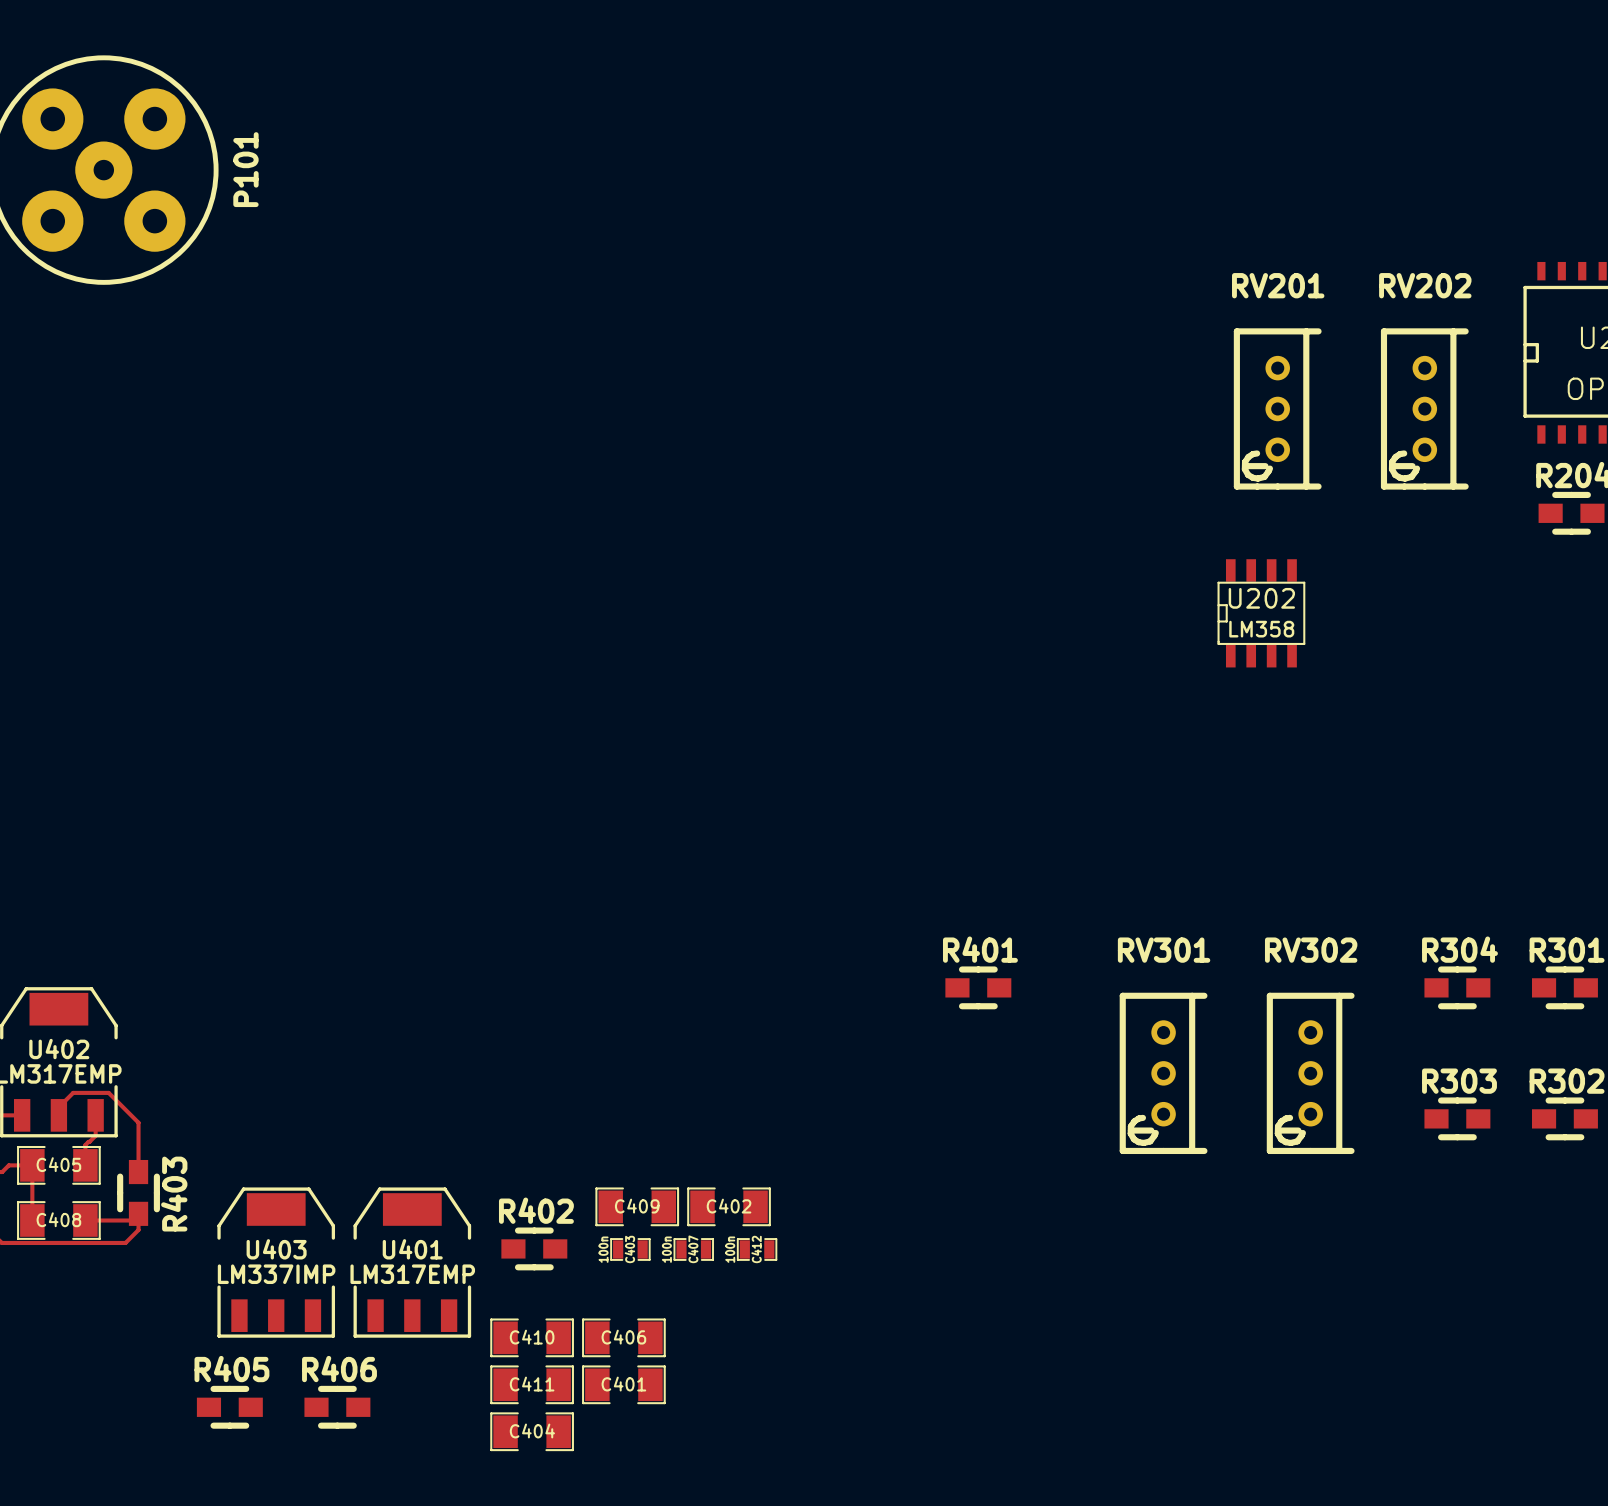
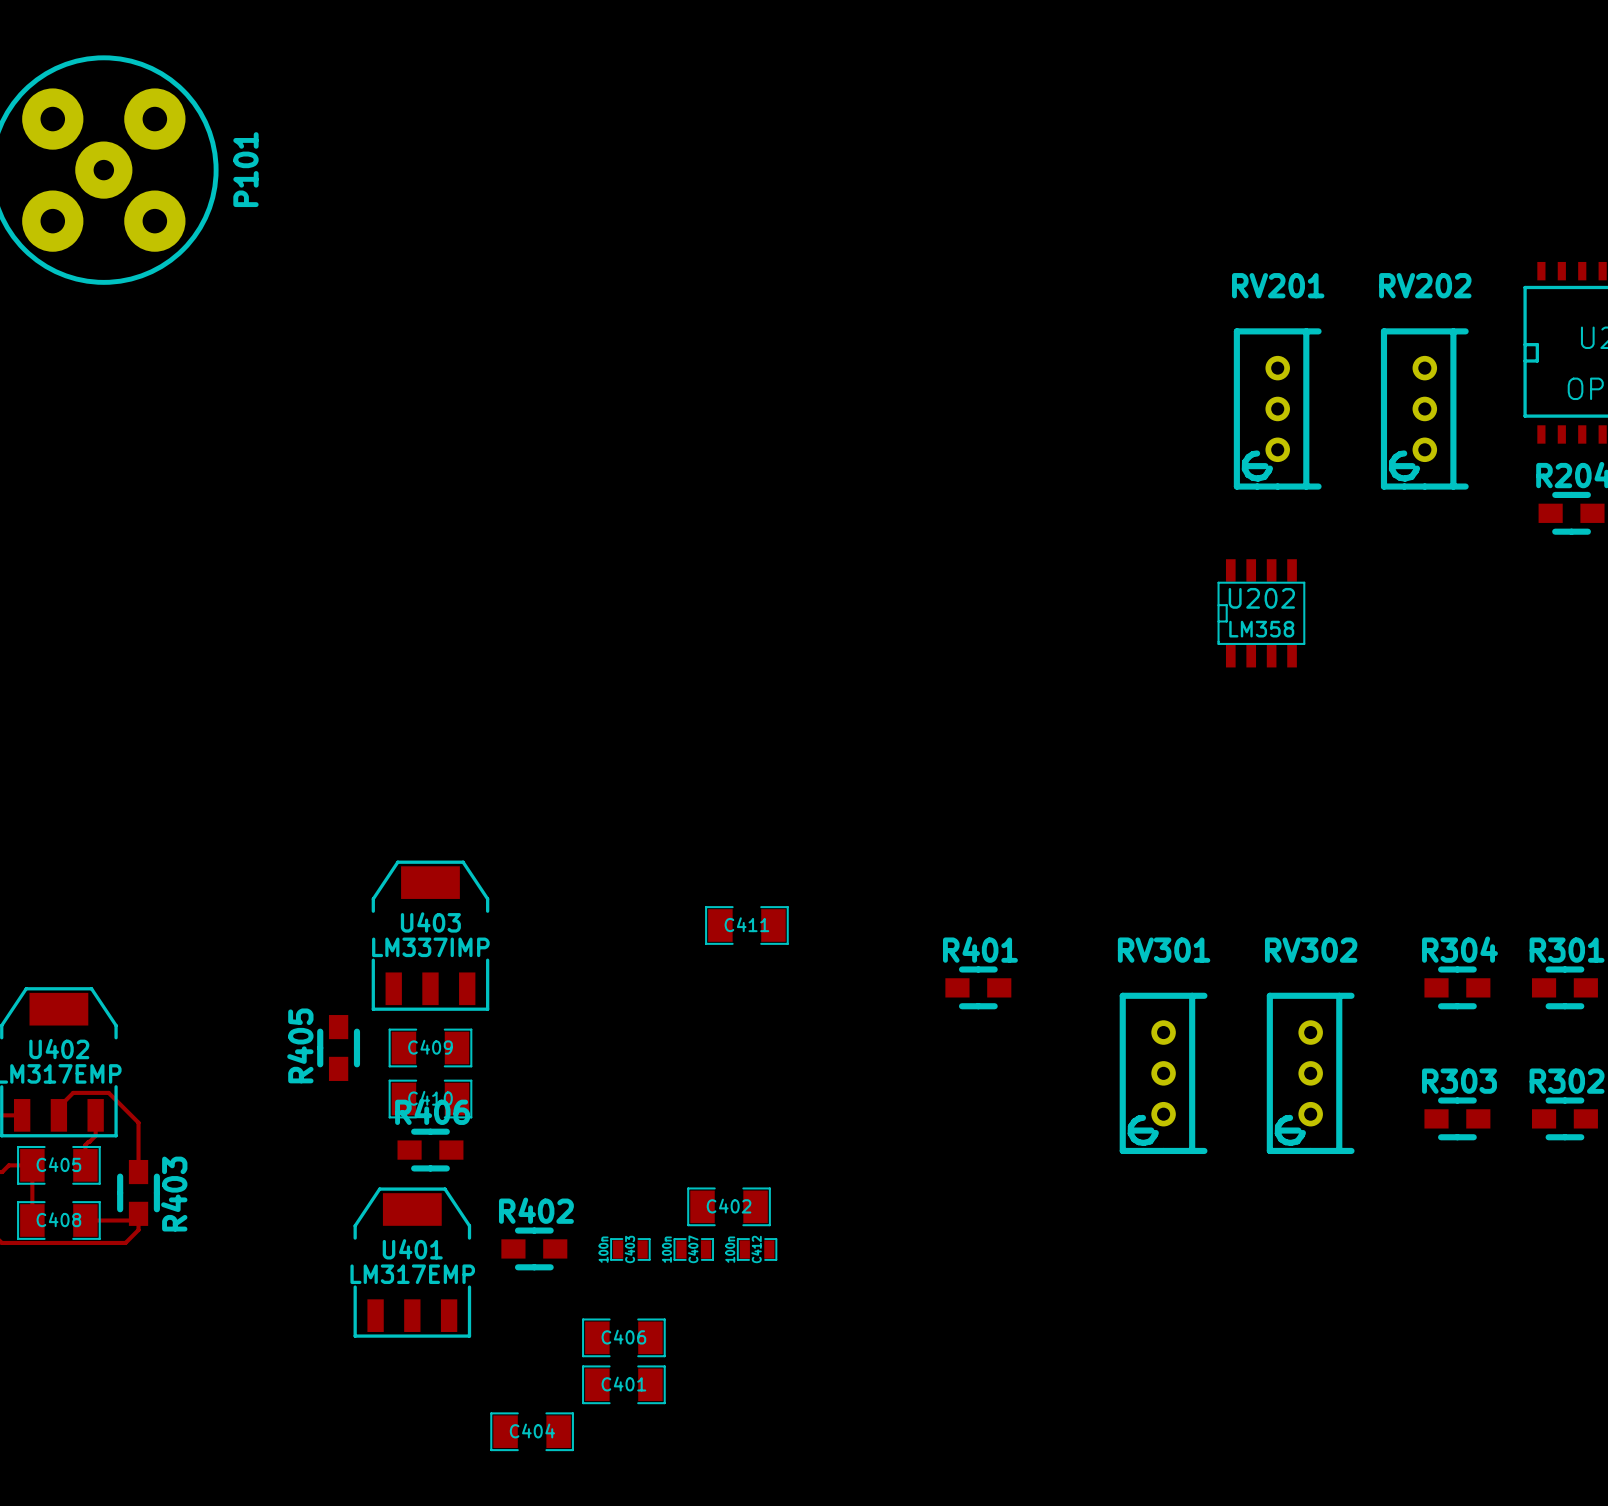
C409 position: (637, 1206) -> (430, 1047)
U403 position: (276, 1262) -> (430, 935)
C410 position: (532, 1337) -> (430, 1099)
R405 name position: R405 (231, 1369) -> R405 (300, 1045)
C411 position: (532, 1384) -> (746, 925)
R405 rotation: 0° (229, 1407) -> 90° clockwise (338, 1047)
R405 position: (229, 1407) -> (338, 1047)
R406 position: (337, 1407) -> (430, 1150)

